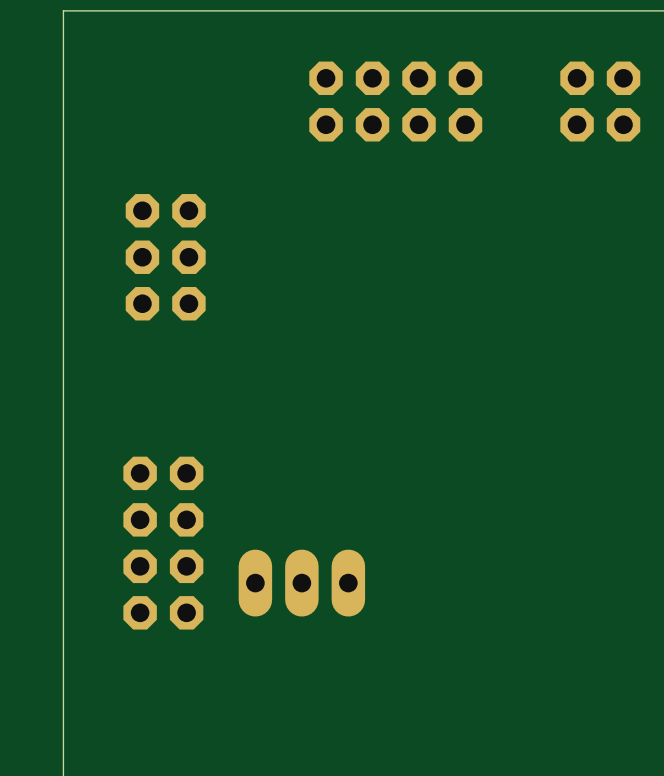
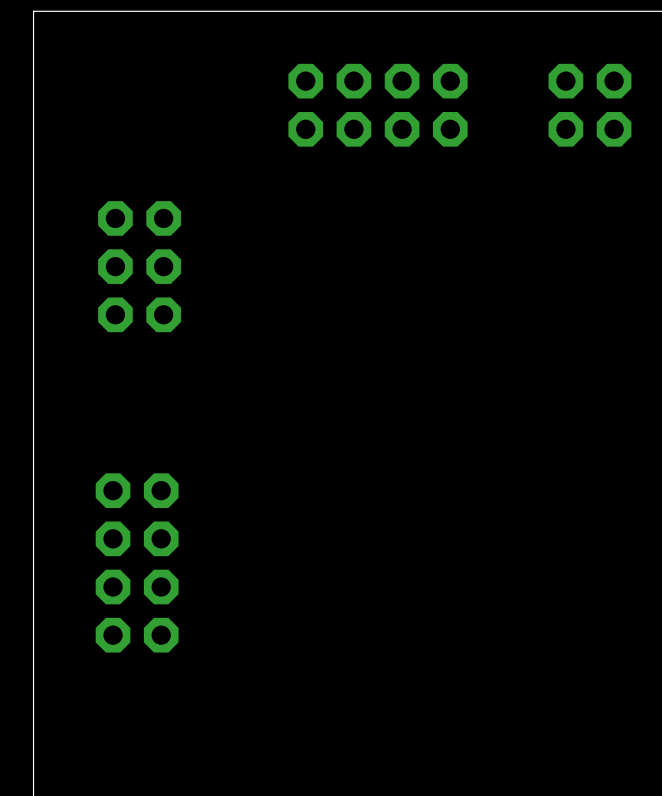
part: (301, 583) -> none

